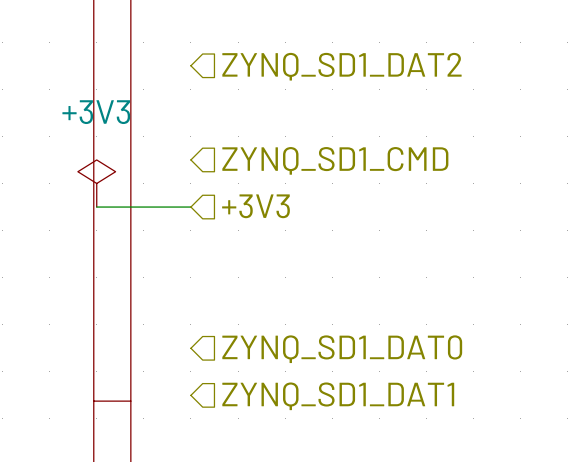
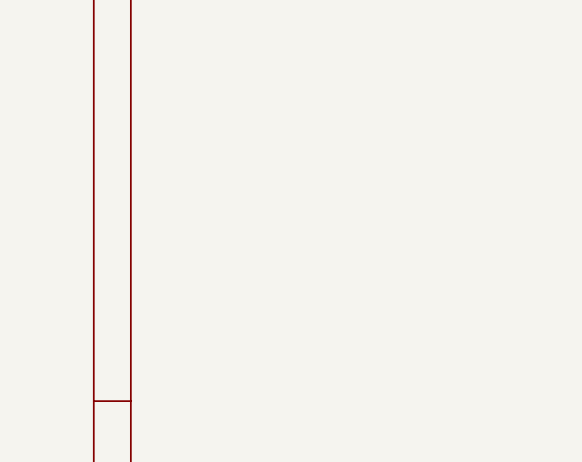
hierarchical label: ZYNQ_SD1_DAT2 (341, 66) -> none
hierarchical label: ZYNQ_SD1_CMD (335, 160) -> none
power symbol: +3V3 (96, 183) -> none
hierarchical label: +3V3 (256, 206) -> none
wire: (96, 207) (190, 207) -> none
hierarchical label: ZYNQ_SD1_DAT0 (342, 349) -> none
hierarchical label: ZYNQ_SD1_DAT1 (338, 396) -> none

